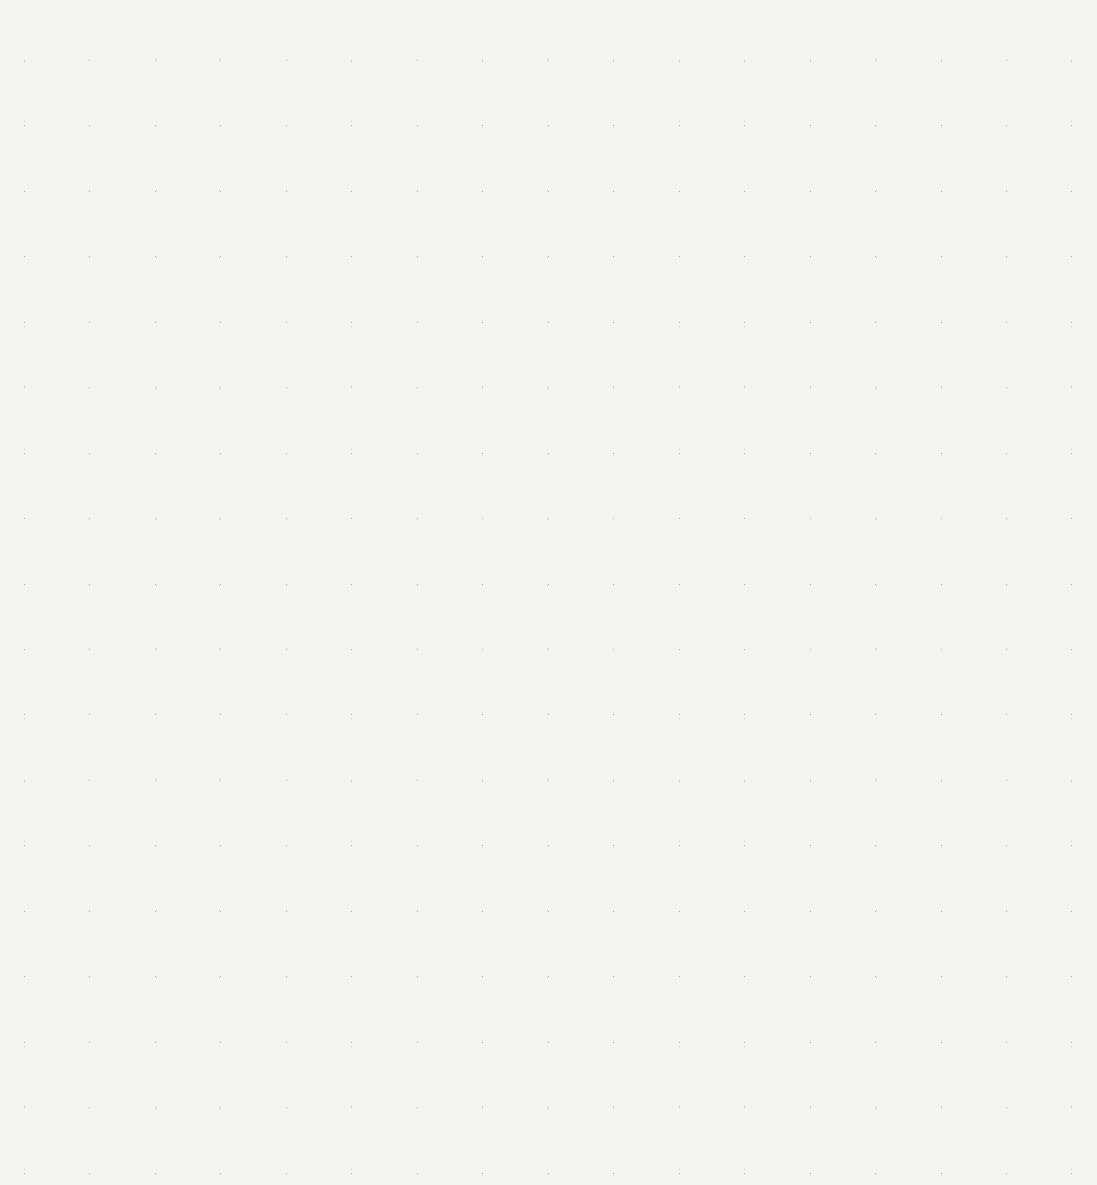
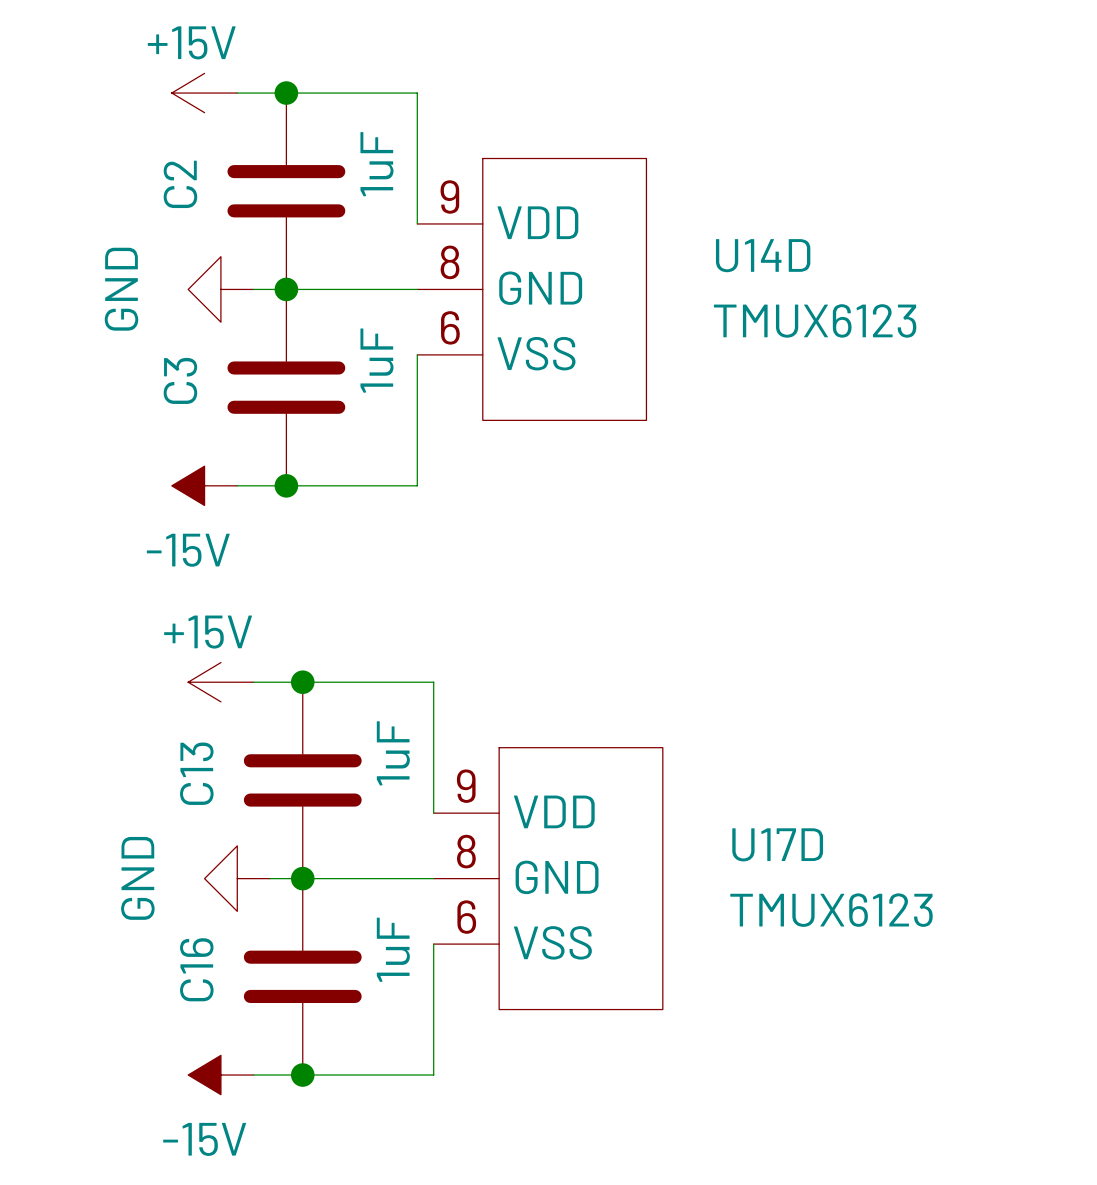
power symbol: none -> +15V (204, 93)
wire: none -> (237, 93) (417, 93) (417, 223)
junction: none -> (286, 93)
C2: none -> 1uF (286, 191)
power symbol: none -> GND (220, 289)
wire: none -> (253, 289) (417, 289)
junction: none -> (286, 289)
U14D: none -> TMUX6123 (531, 289)
wire: none -> (417, 354) (417, 485) (237, 485)
C3: none -> 1uF (286, 387)
power symbol: none -> -15V (204, 485)
junction: none -> (286, 485)
power symbol: none -> +15V (220, 682)
wire: none -> (253, 682) (433, 682) (433, 813)
junction: none -> (302, 682)
C13: none -> 1uF (302, 780)
power symbol: none -> GND (237, 878)
wire: none -> (270, 878) (433, 878)
junction: none -> (302, 878)
U17D: none -> TMUX6123 (548, 878)
wire: none -> (433, 944) (433, 1075) (253, 1075)
C16: none -> 1uF (302, 976)
power symbol: none -> -15V (220, 1075)
junction: none -> (302, 1075)

